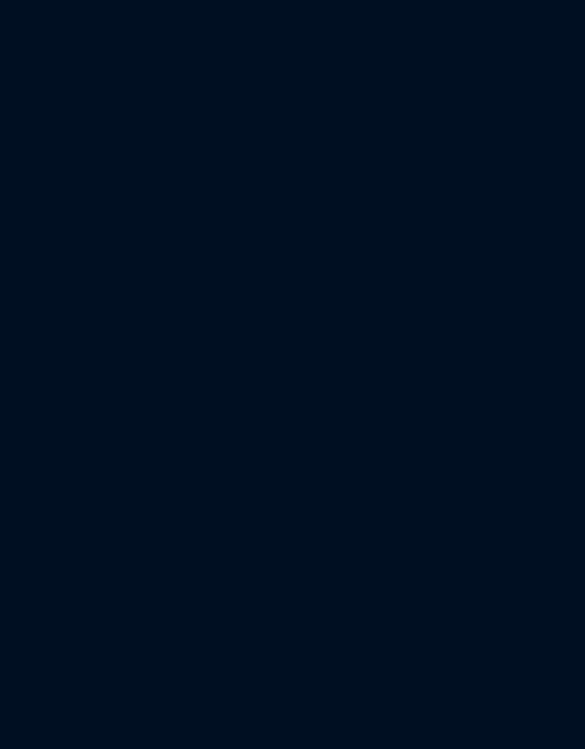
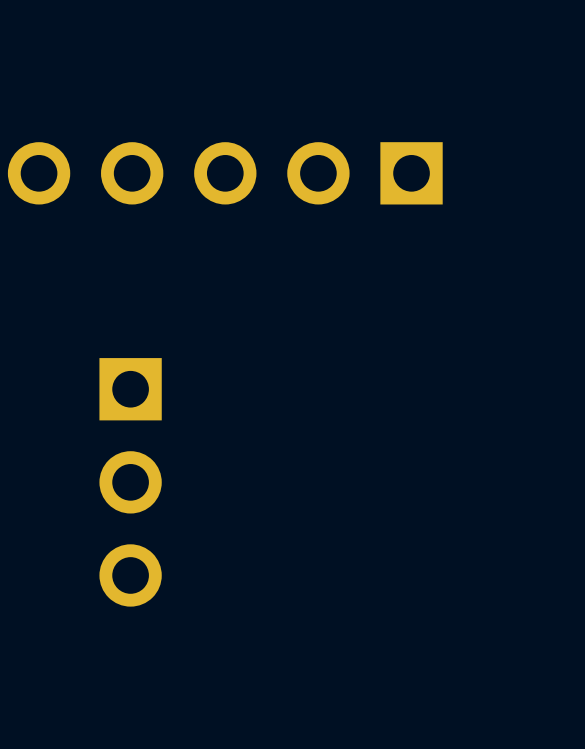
part: none -> (225, 173)
part: none -> (130, 482)

